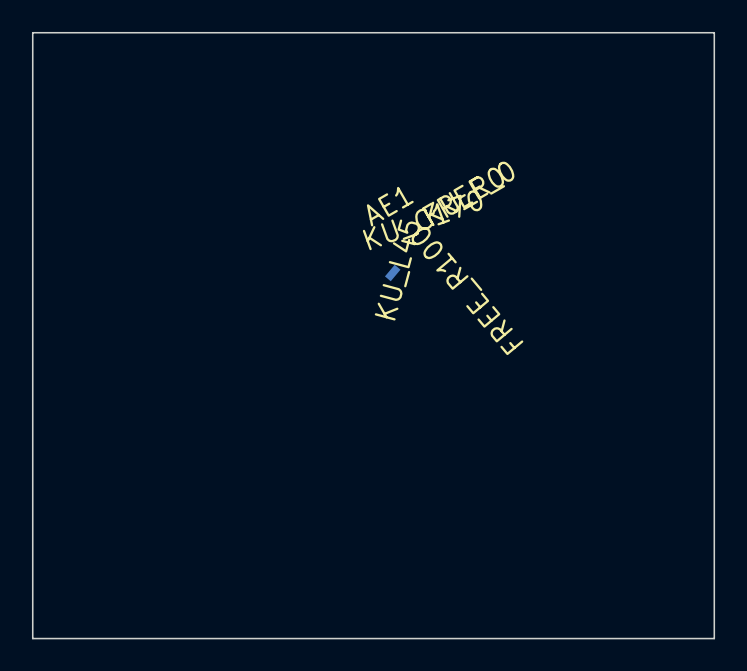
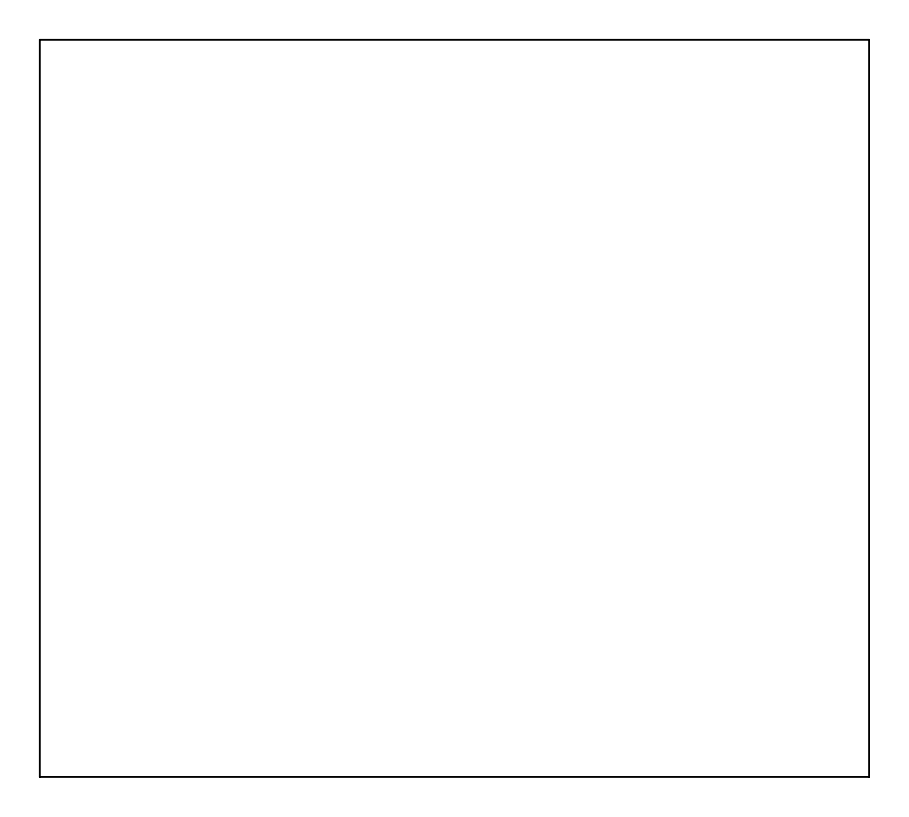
AE1: (392, 273) -> none

